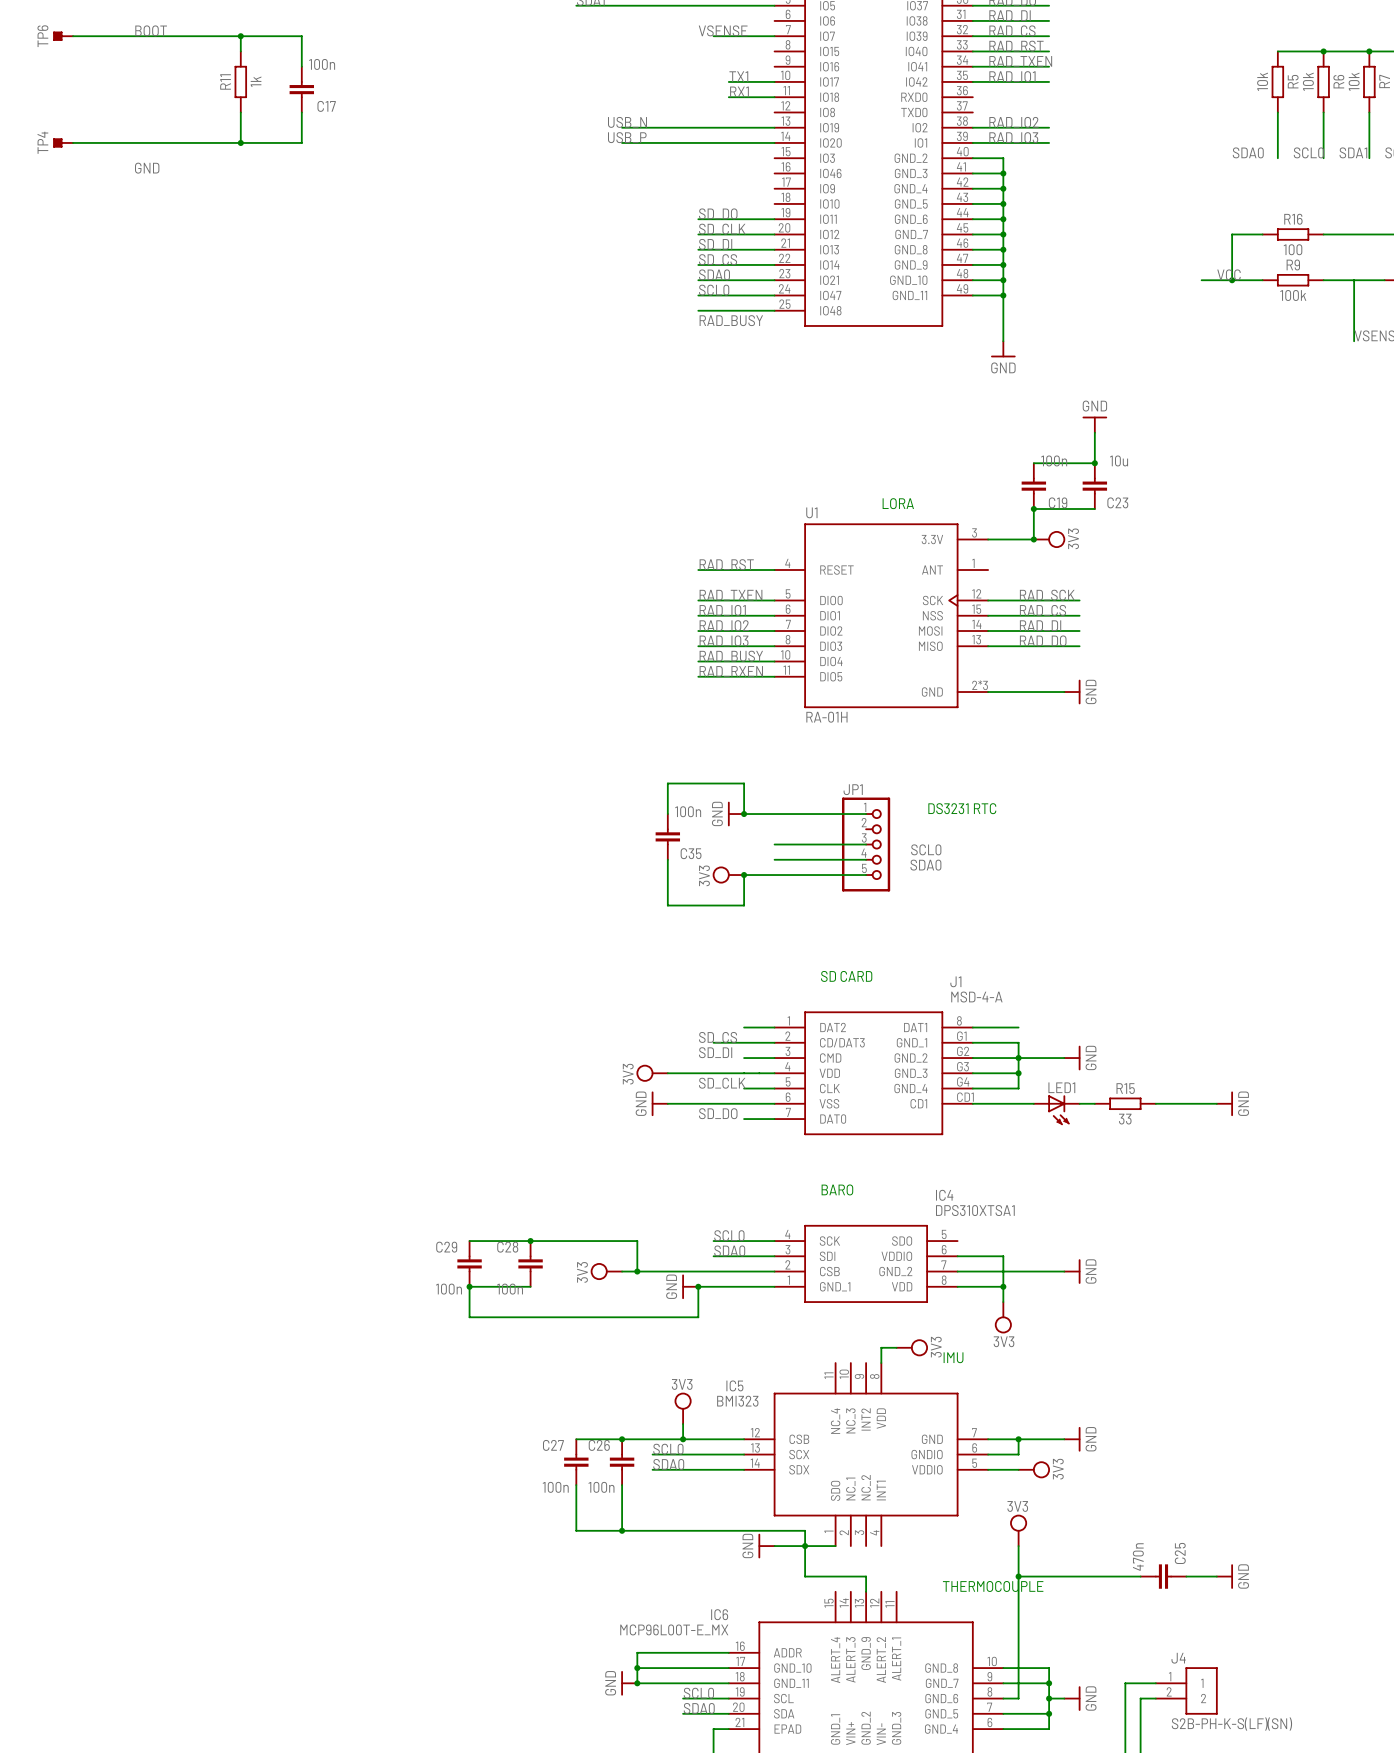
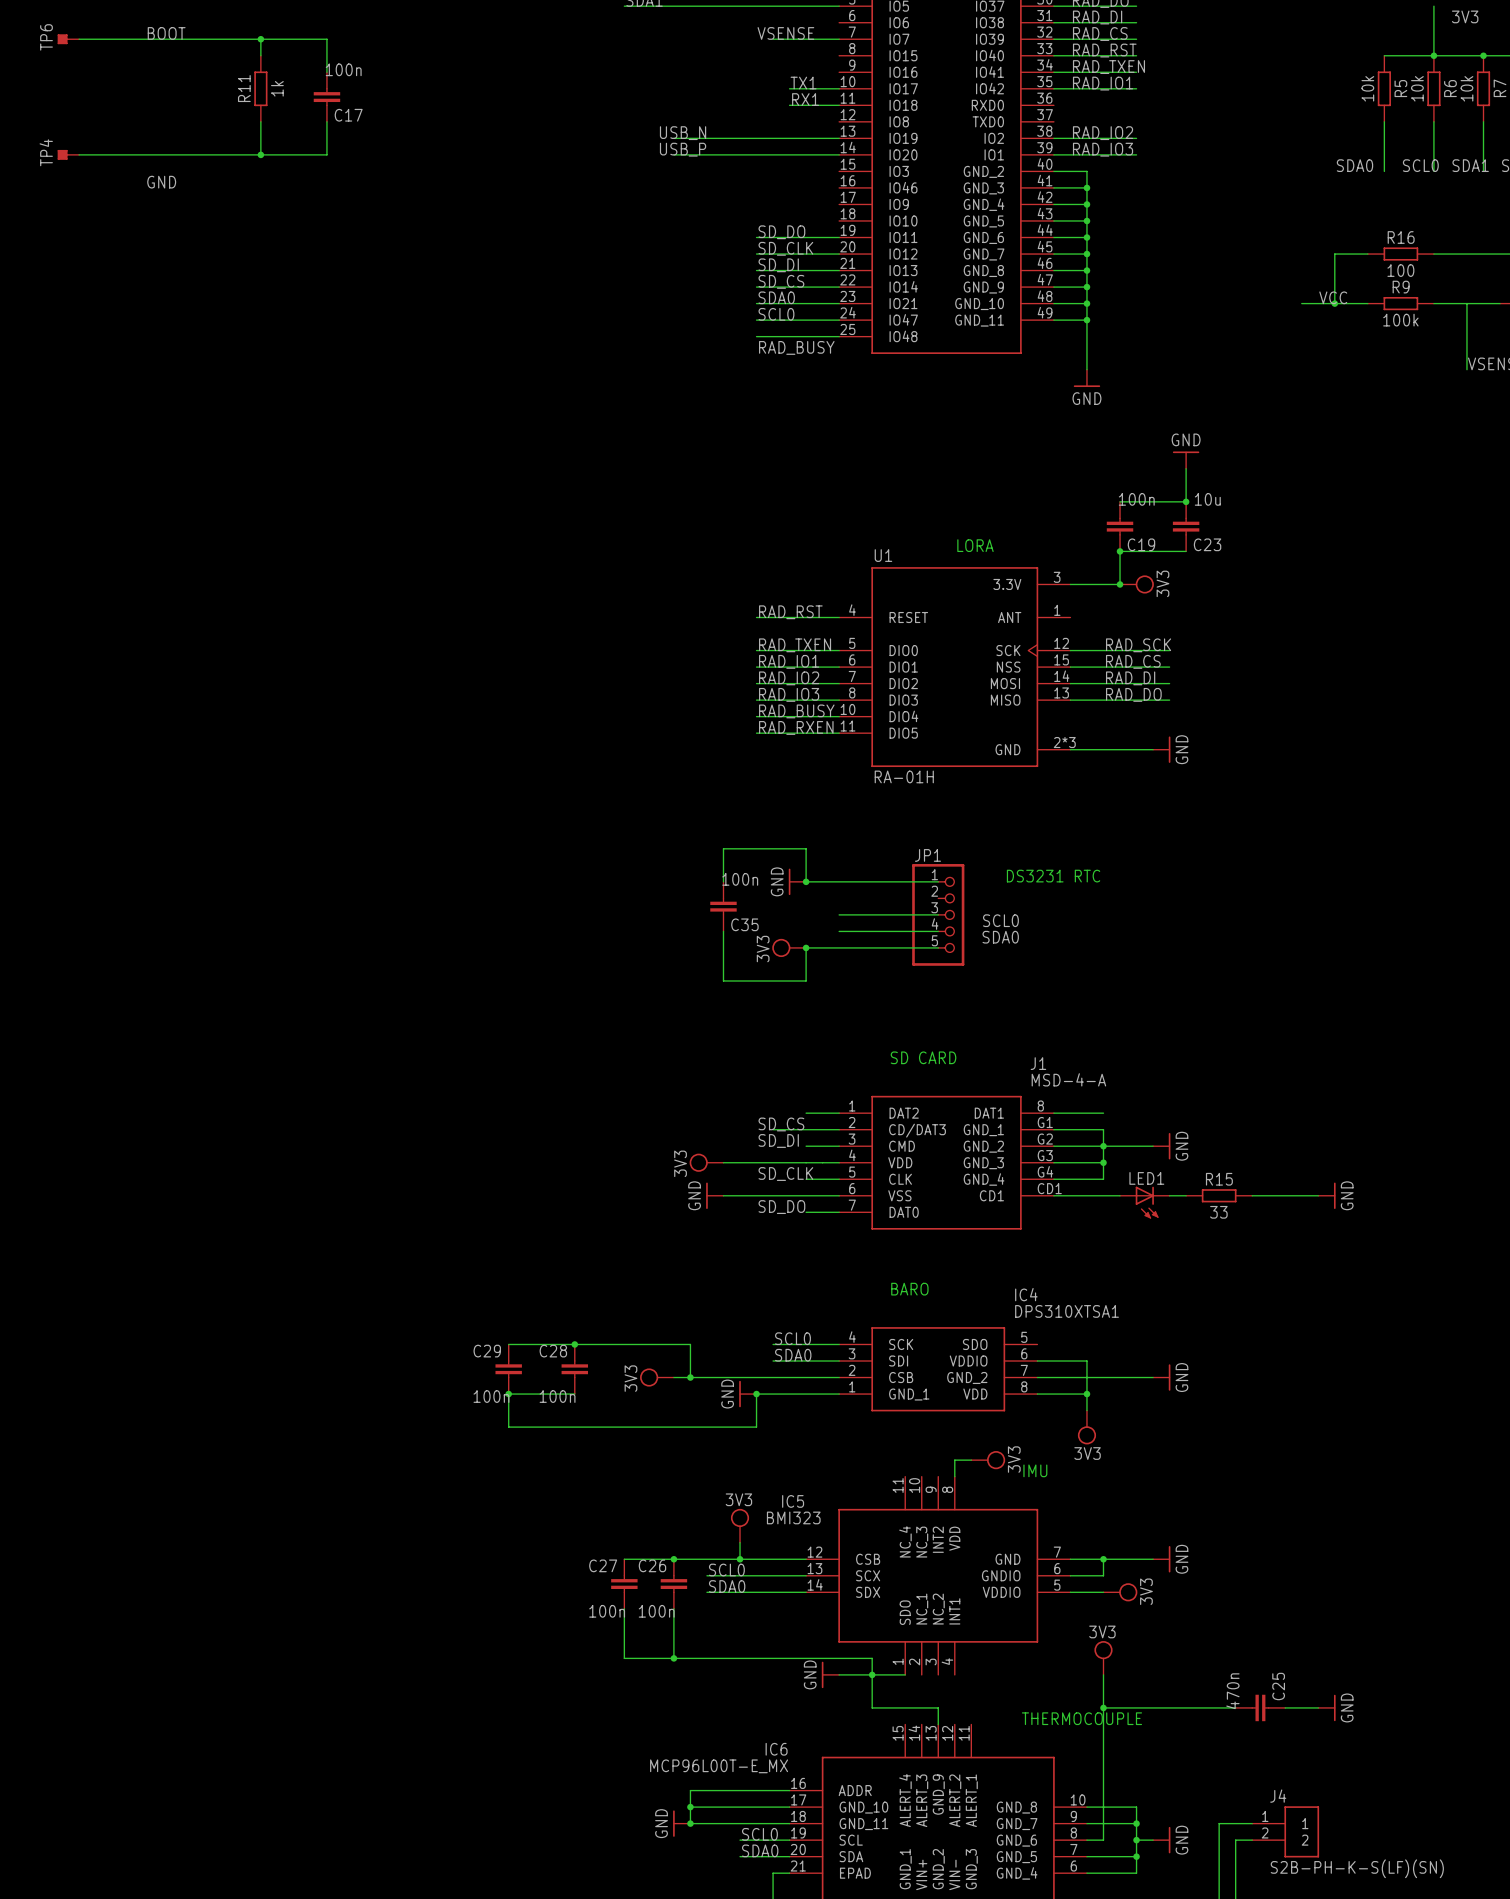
wire: none -> (1433, 6) (1433, 55)
label: none -> 3V3 (1465, 16)

